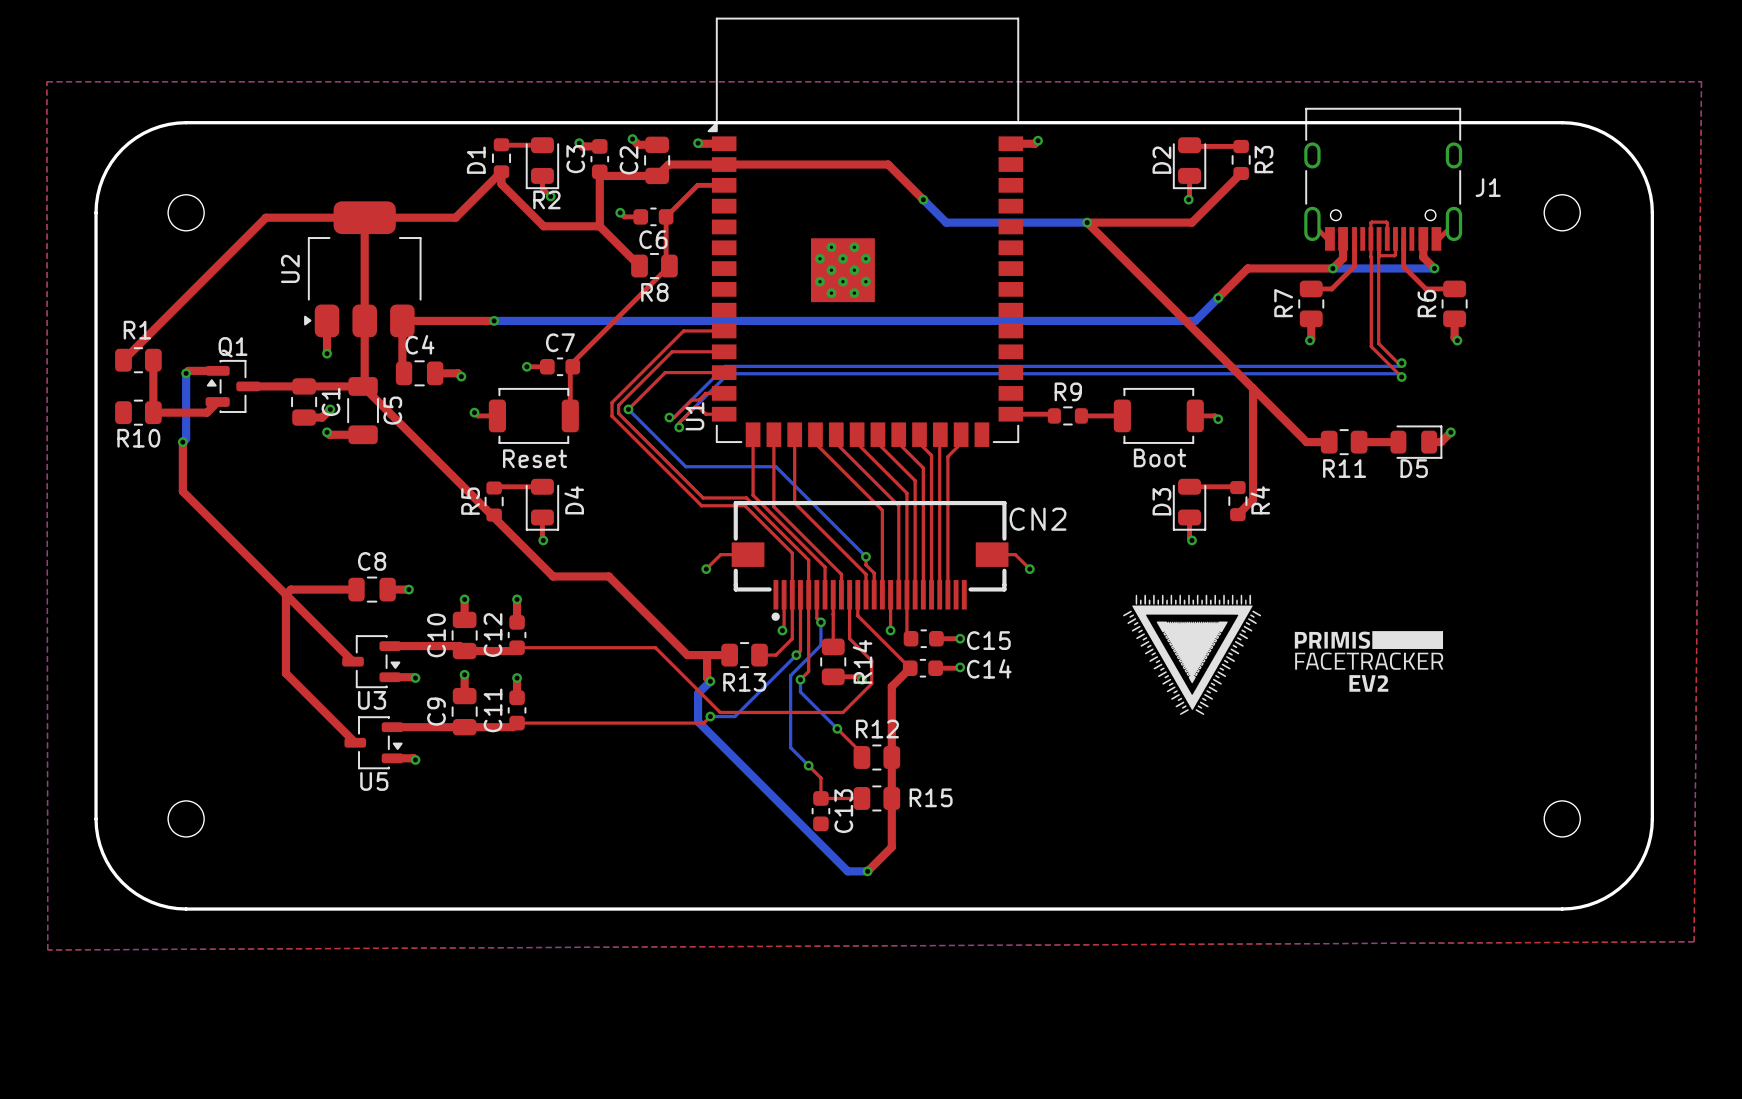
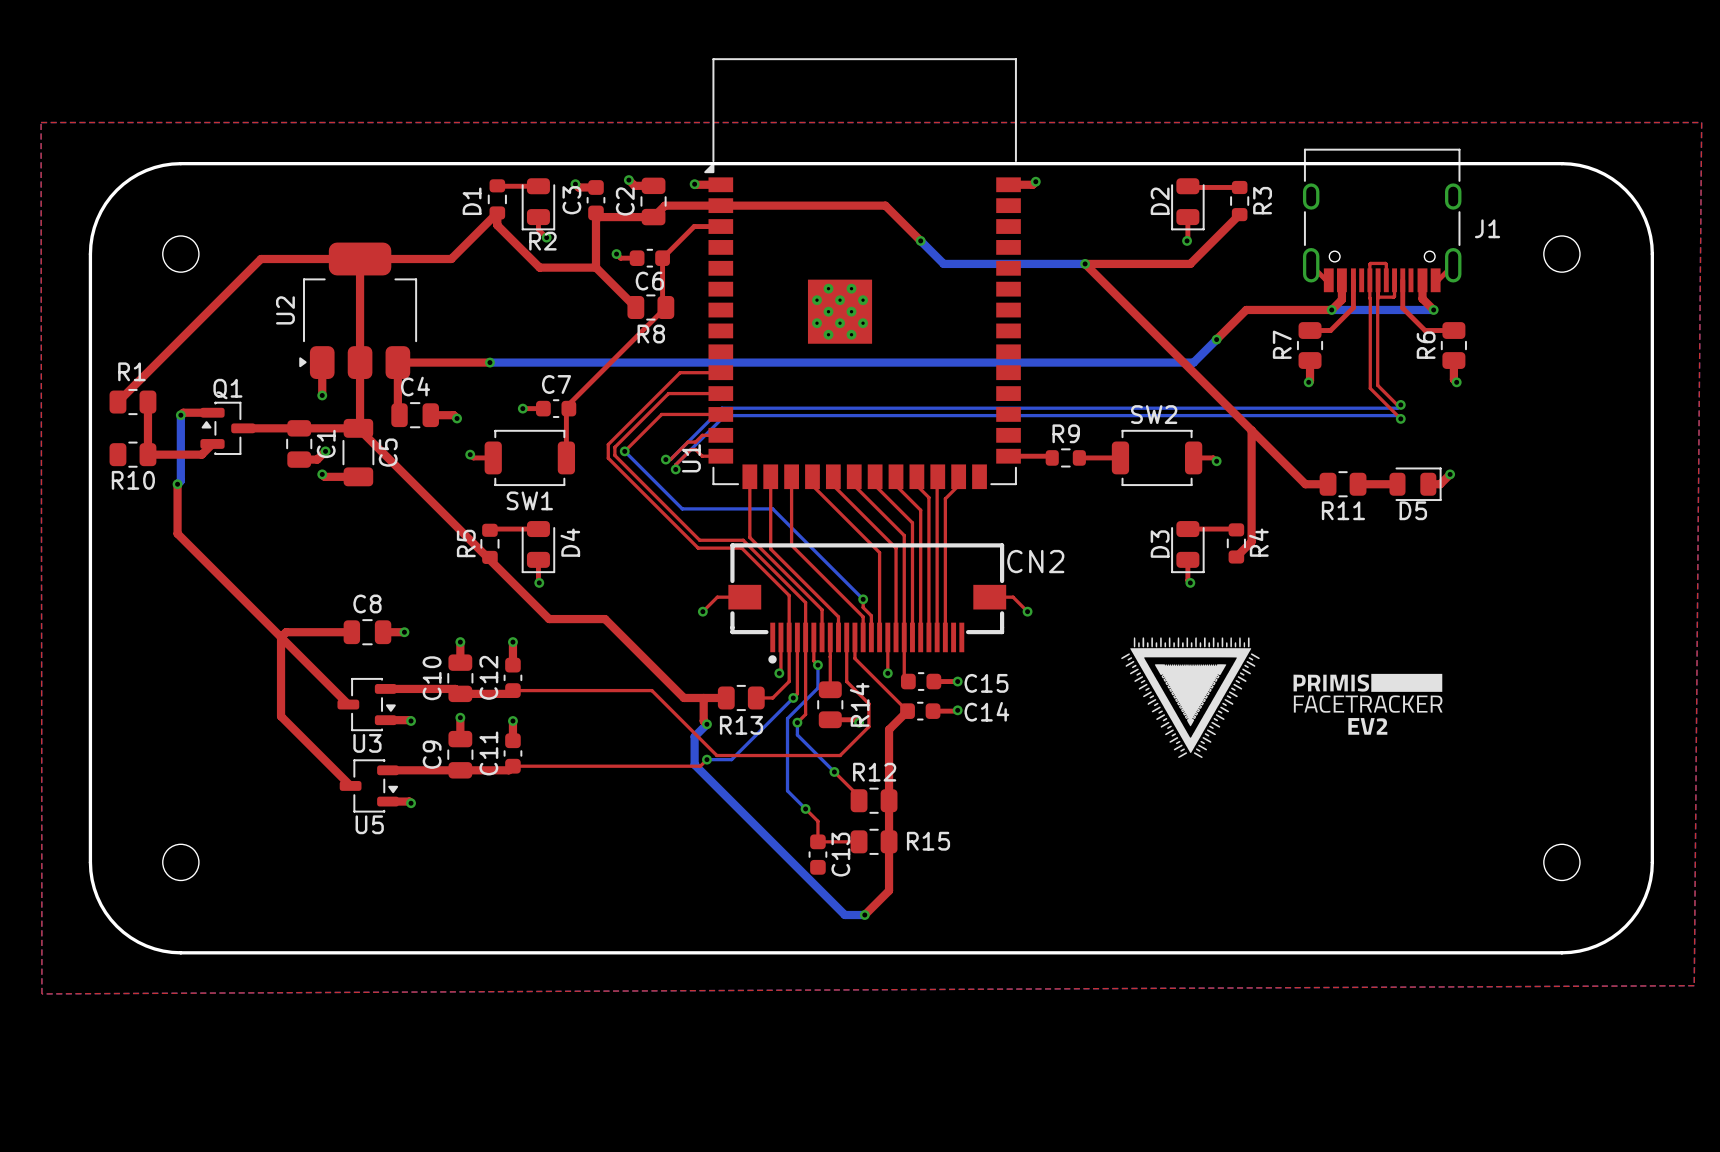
Boot name: Boot (1160, 457) -> SW2 (1154, 414)
Reset name: Reset (535, 458) -> SW1 (529, 500)

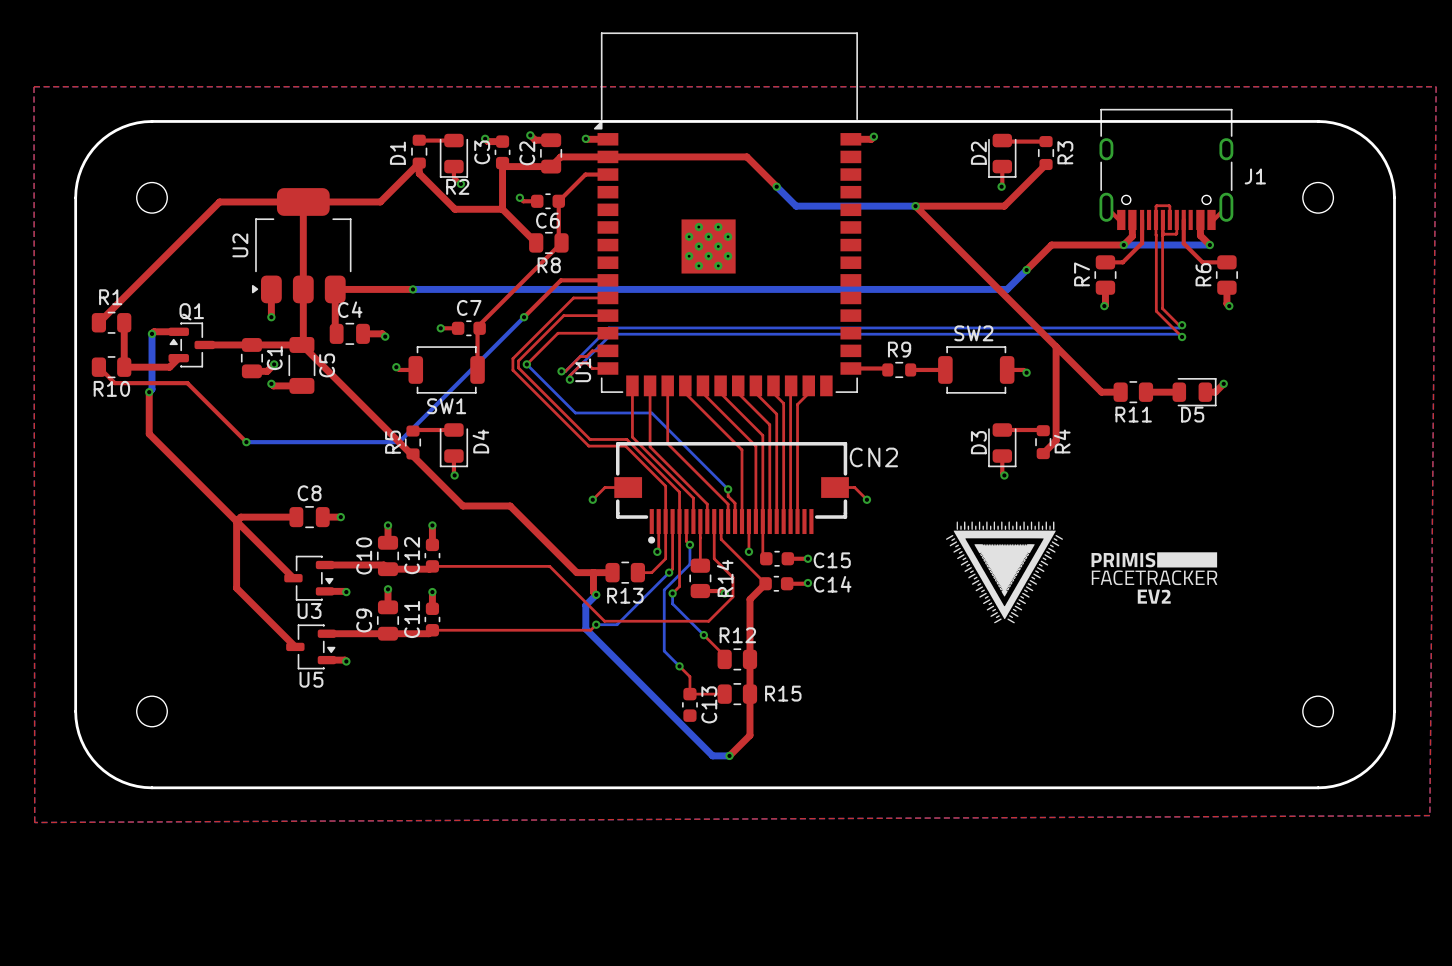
top track: none -> (607, 280) (560, 280) (524, 317)
bottom track: none -> (524, 317) (399, 442) (246, 442)
via: none -> (524, 317)
top track: none -> (98, 367) (114, 383) (187, 383) (246, 442)
via: none -> (246, 442)

